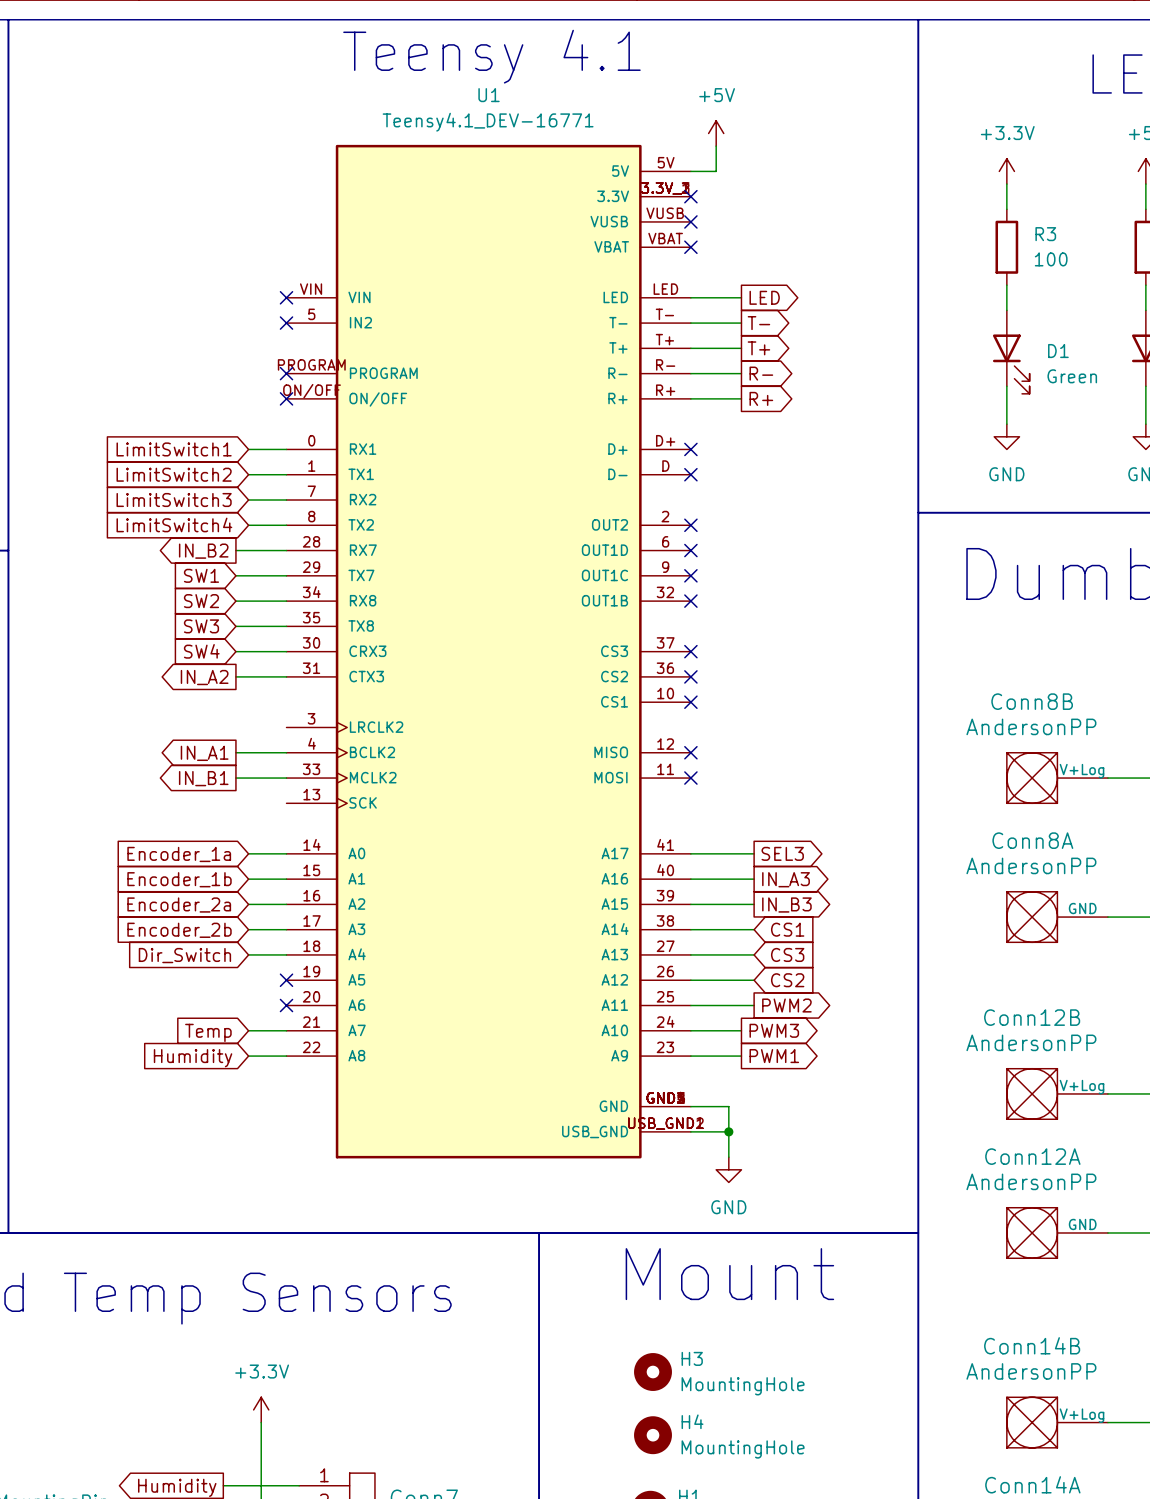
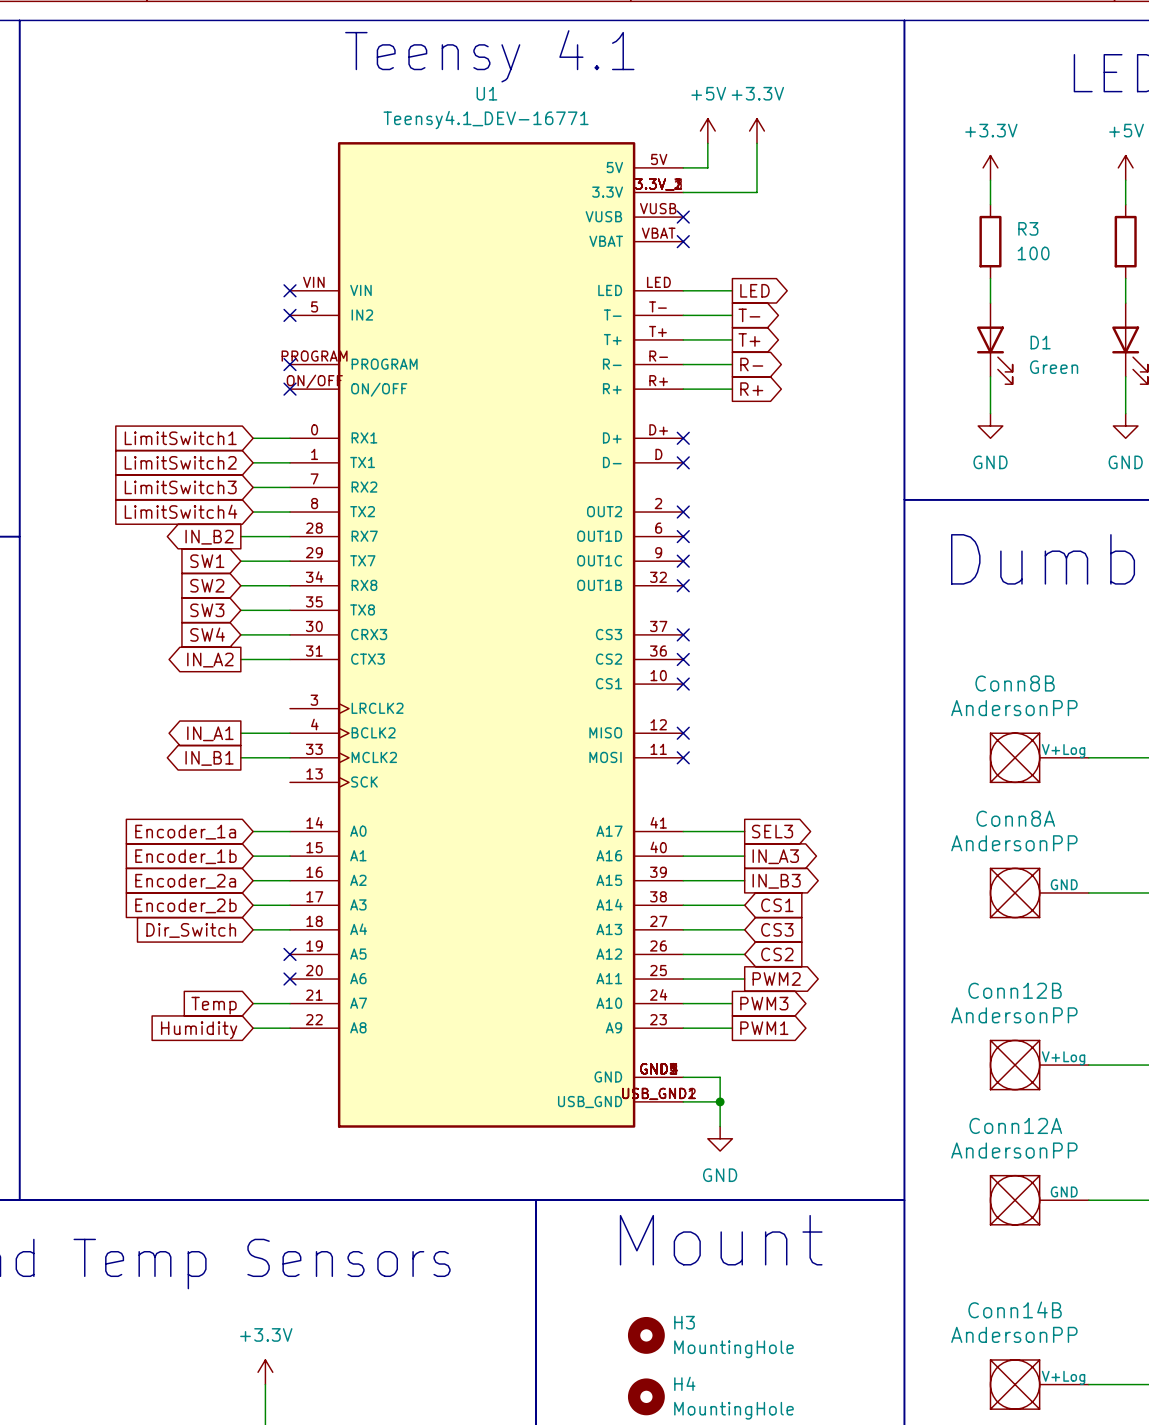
power symbol: none -> +3.3V (756, 131)
wire: none -> (756, 143) (756, 192) (683, 192)
no-connect mark: (690, 196) -> none

